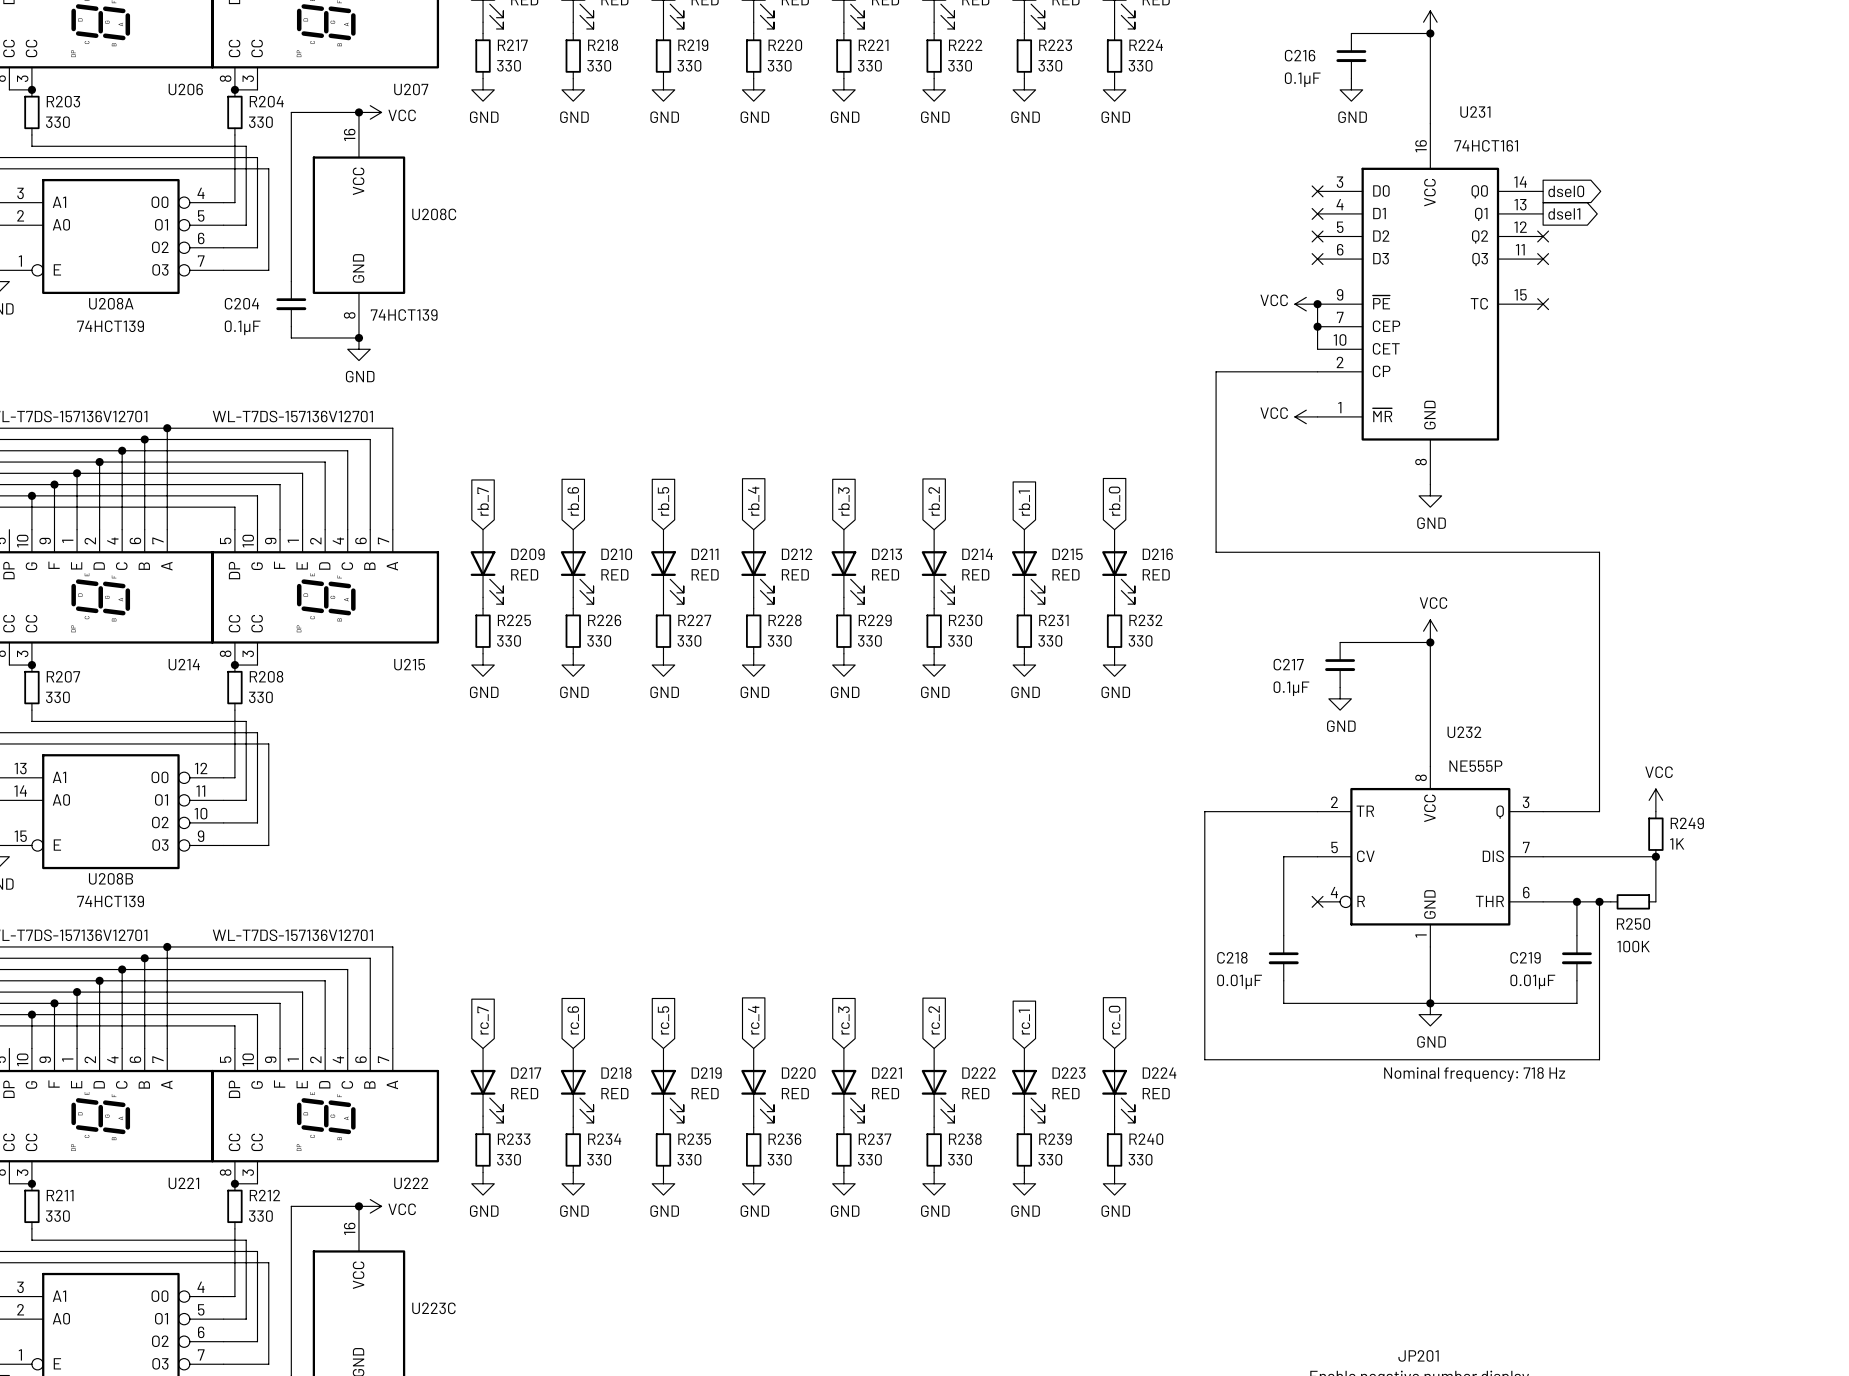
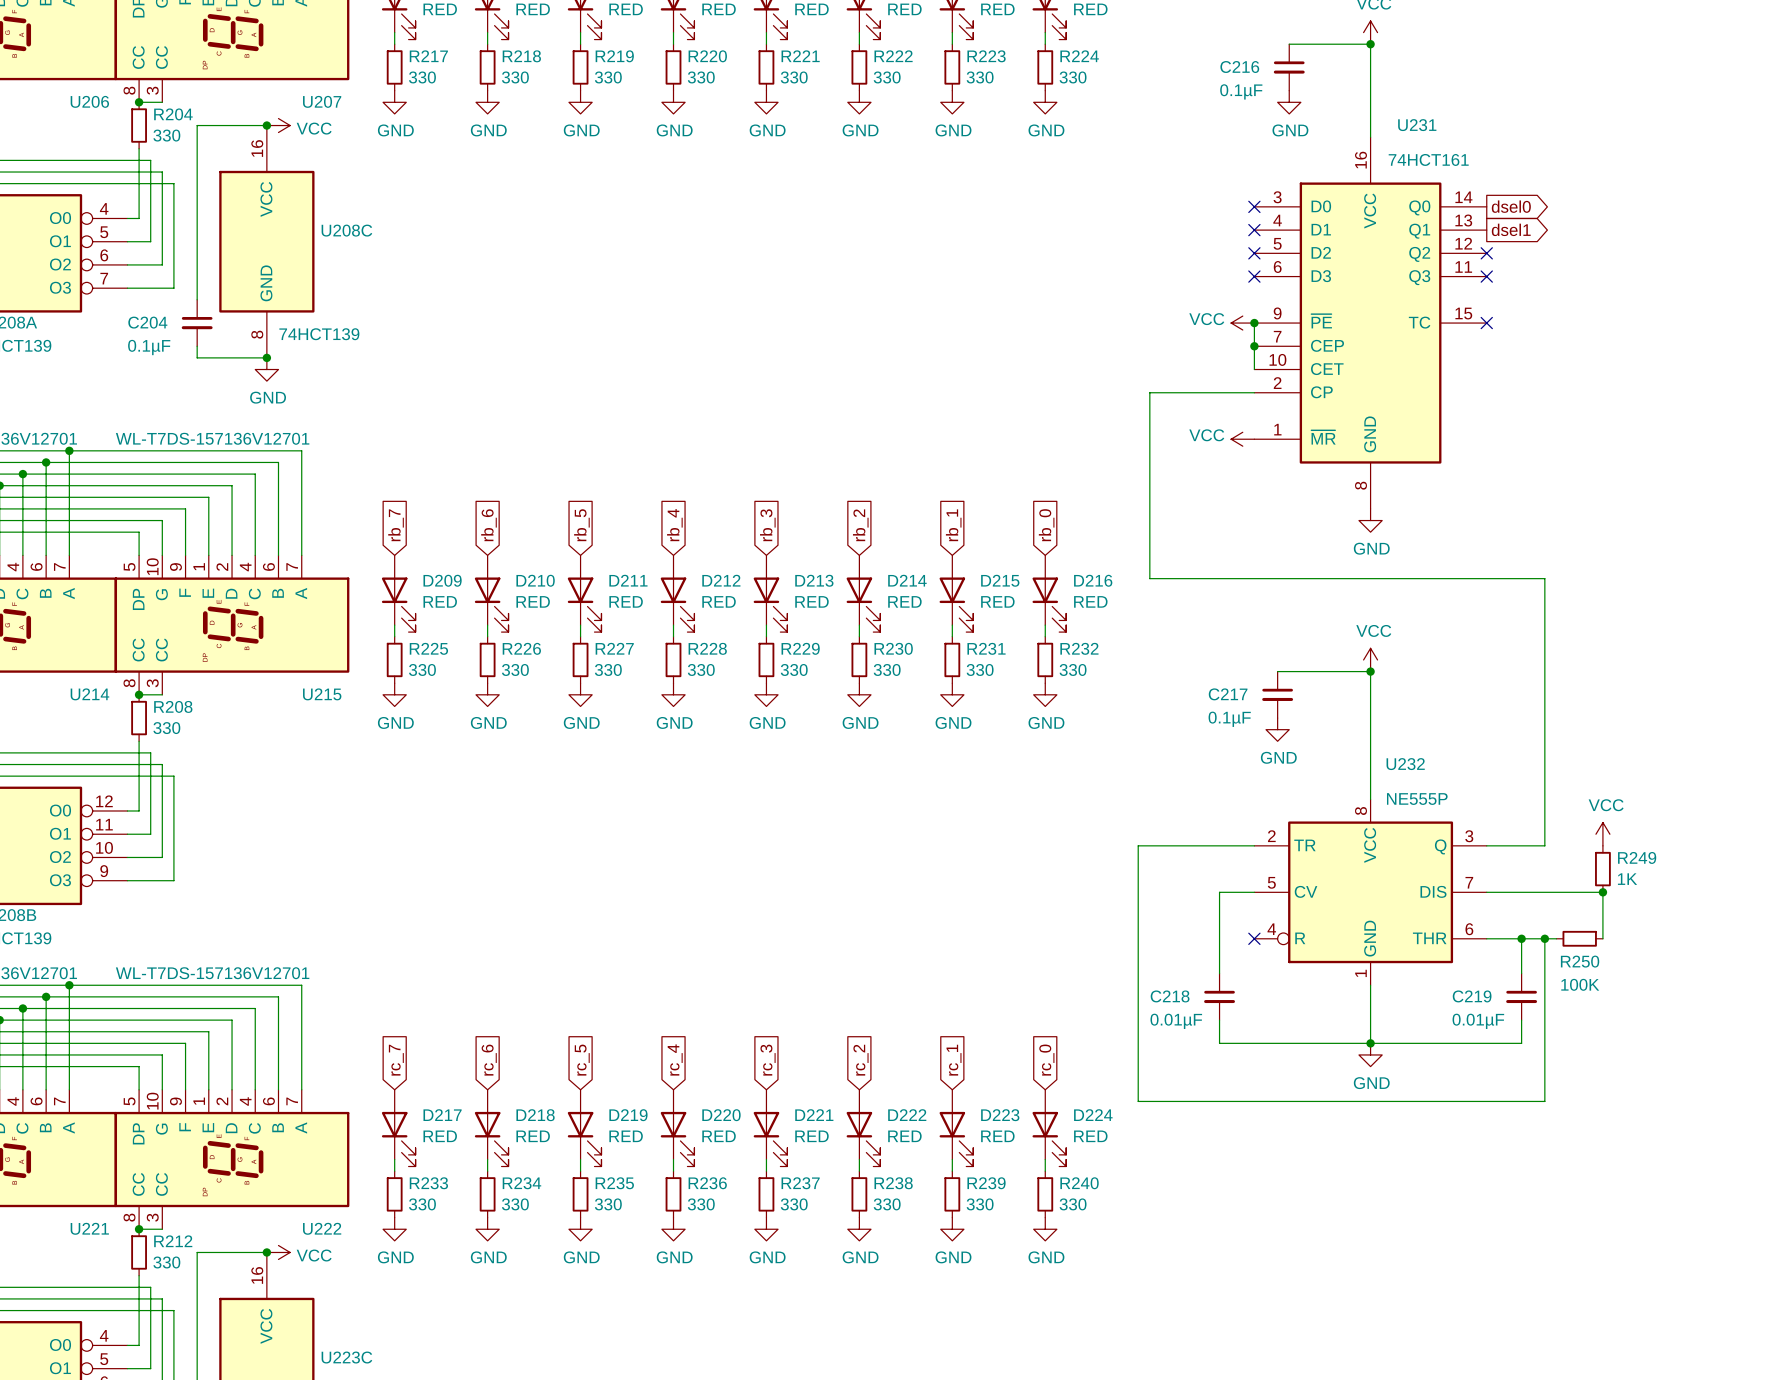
text: Nominal frequency: 718 Hz (1474, 1074) -> none

